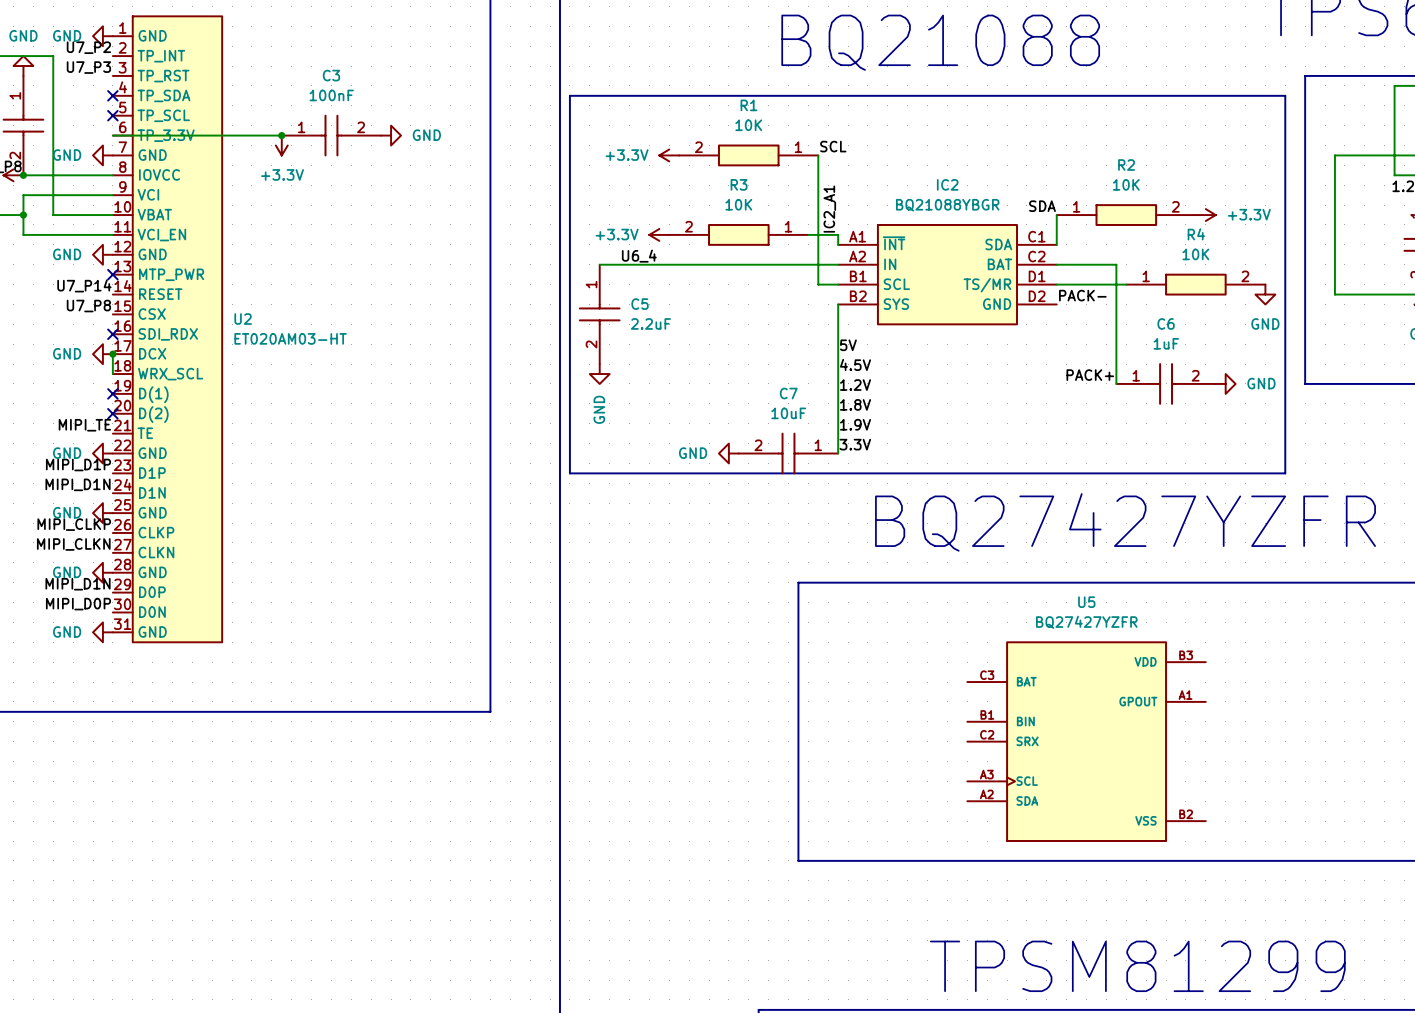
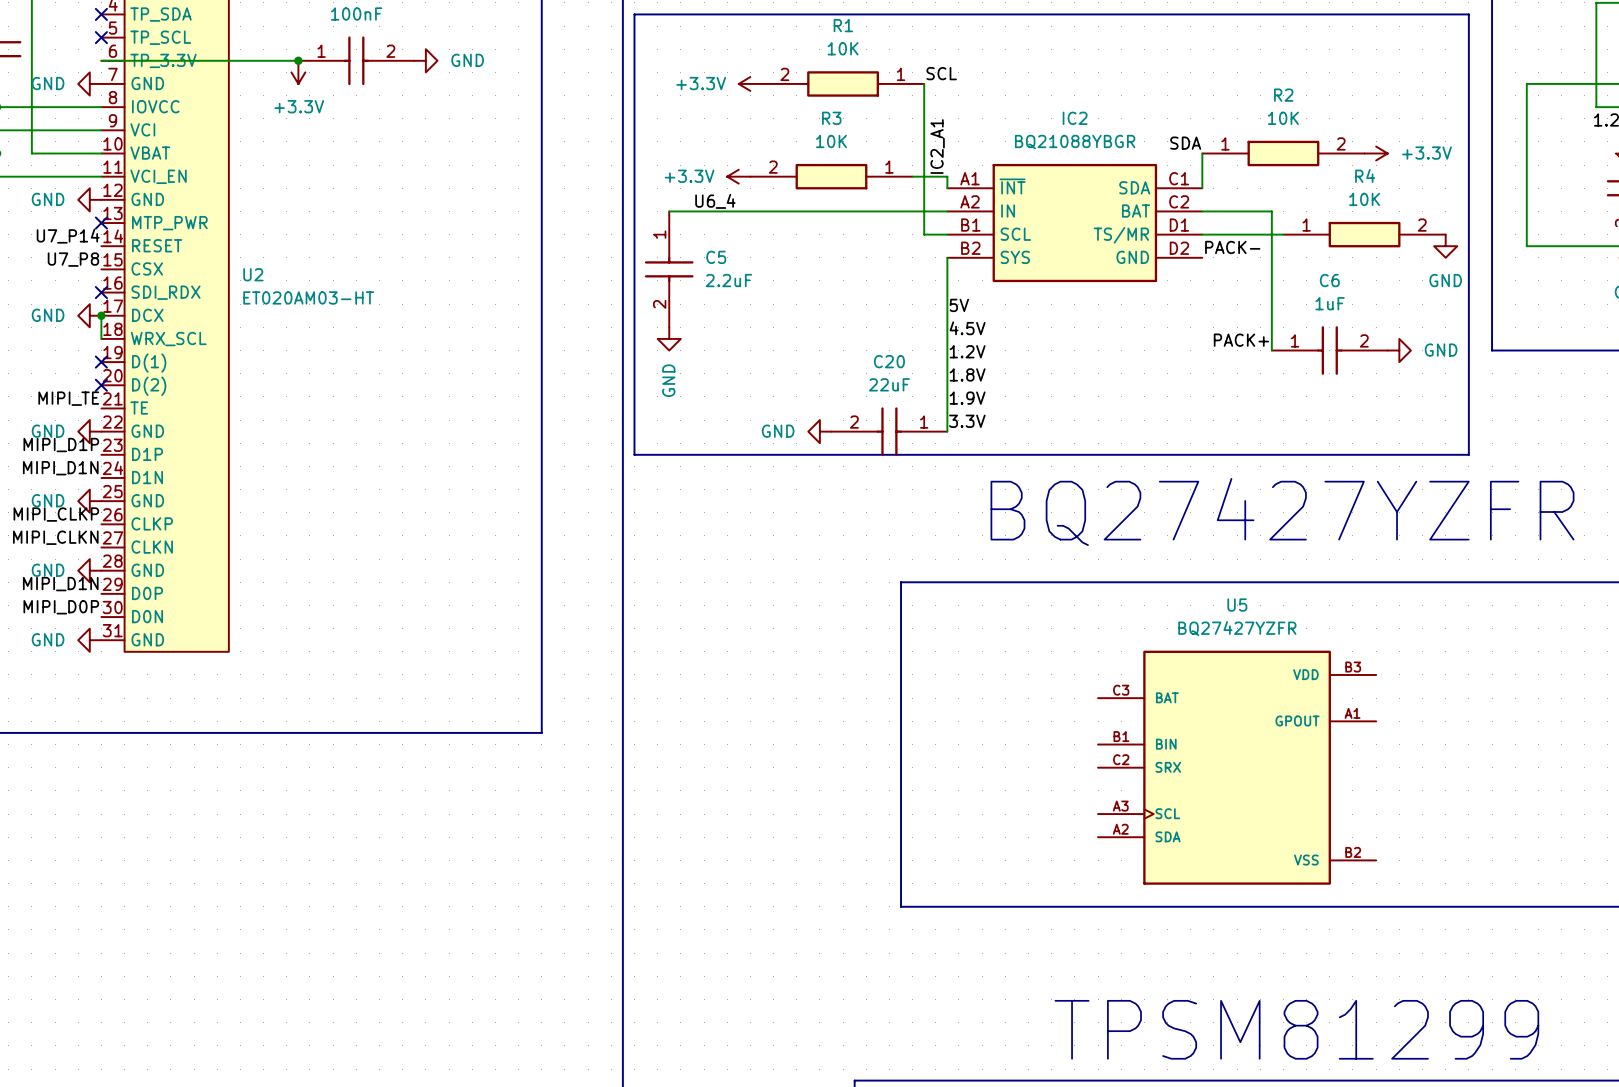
C7 name: C7 (788, 393) -> C20 (889, 361)
C7 value: 10uF (788, 413) -> 22uF (889, 384)

